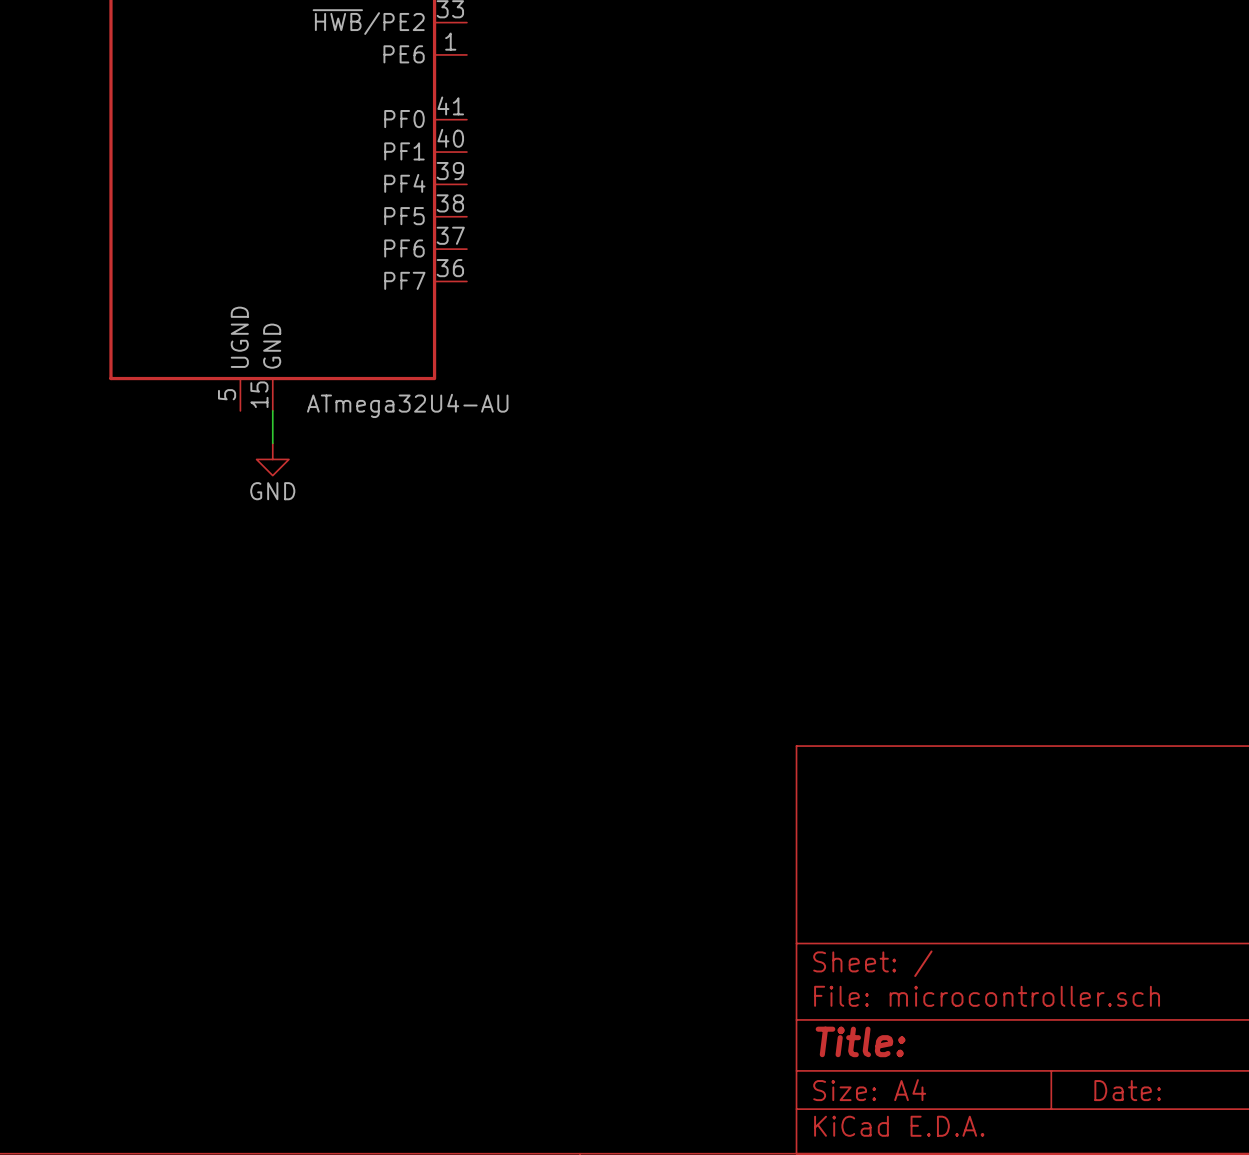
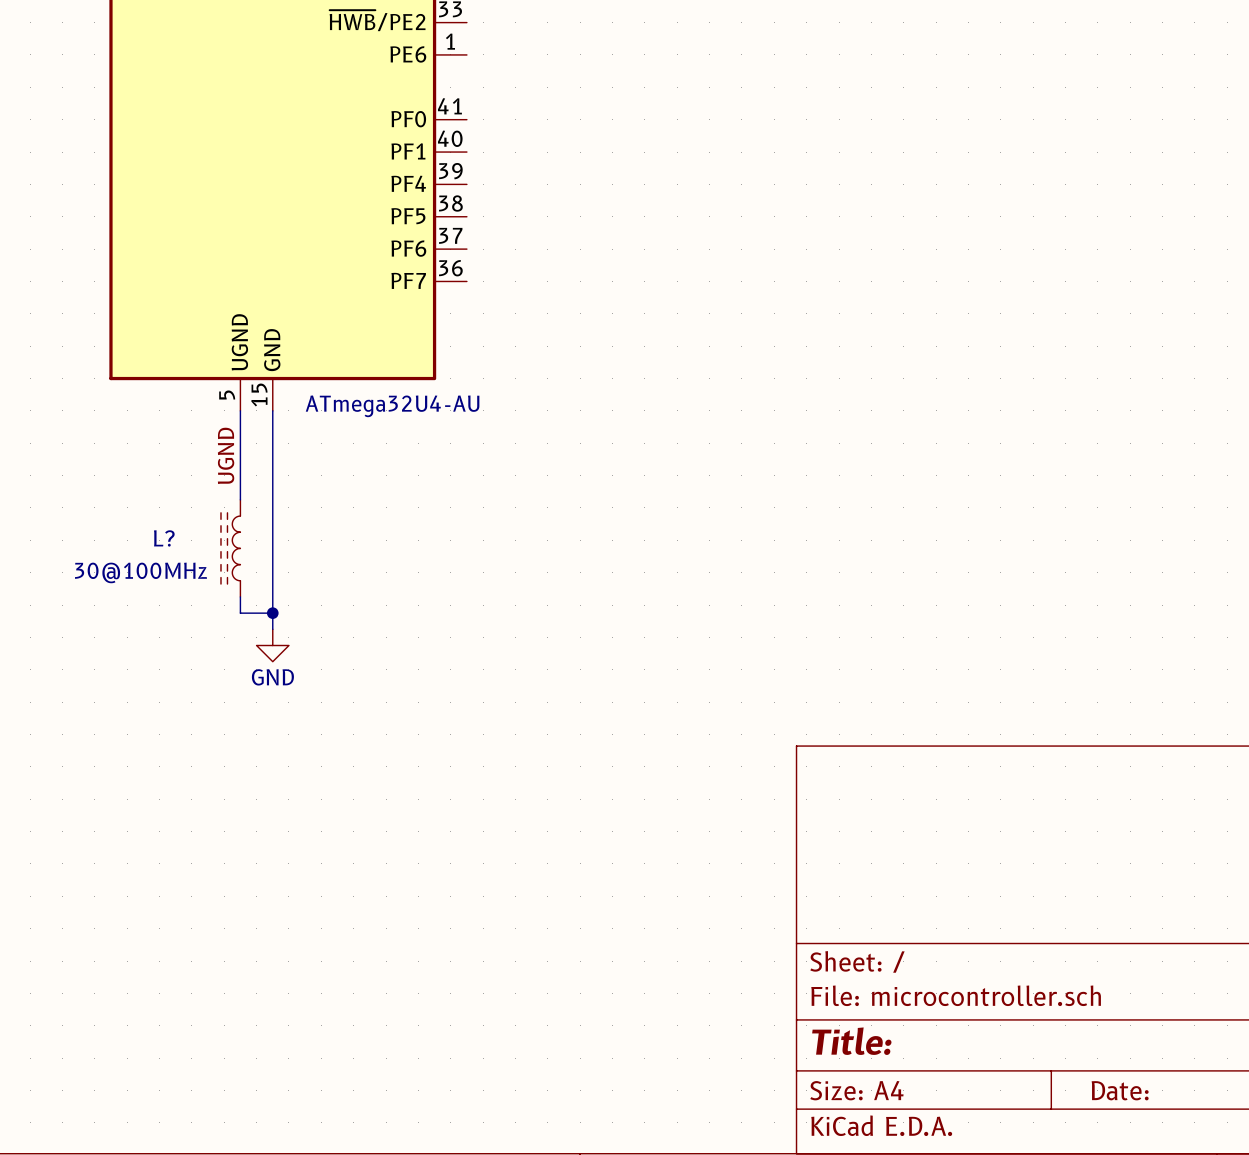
wire: none -> (240, 410) (240, 499)
wire: none -> (272, 443) (272, 629)
power symbol position: GND (272, 459) -> GND (272, 645)
label: none -> UGND (226, 455)
L?: none -> (230, 548)
wire: none -> (240, 596) (240, 613) (272, 613)
junction: none -> (272, 613)

